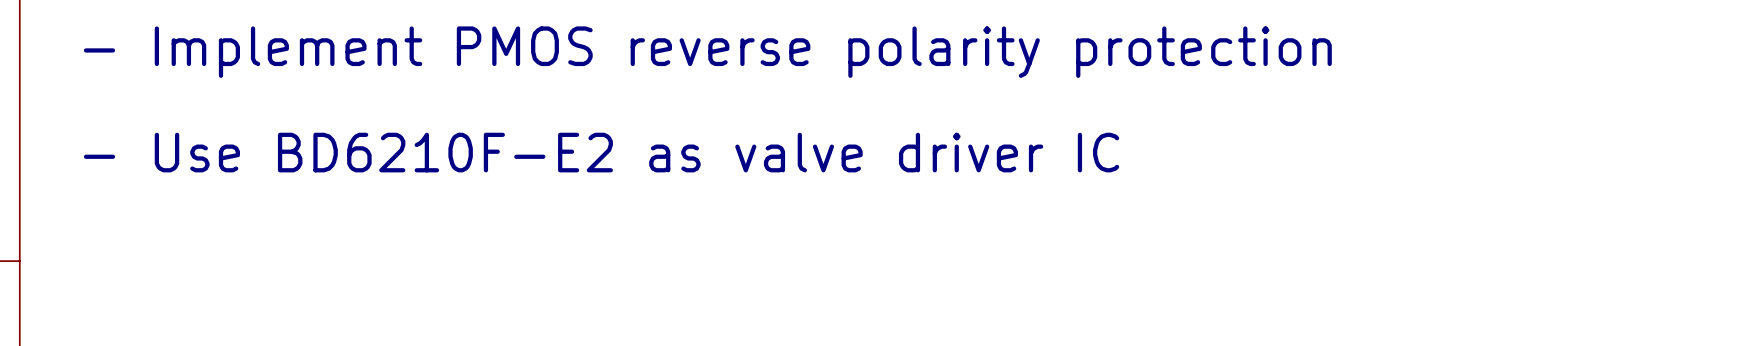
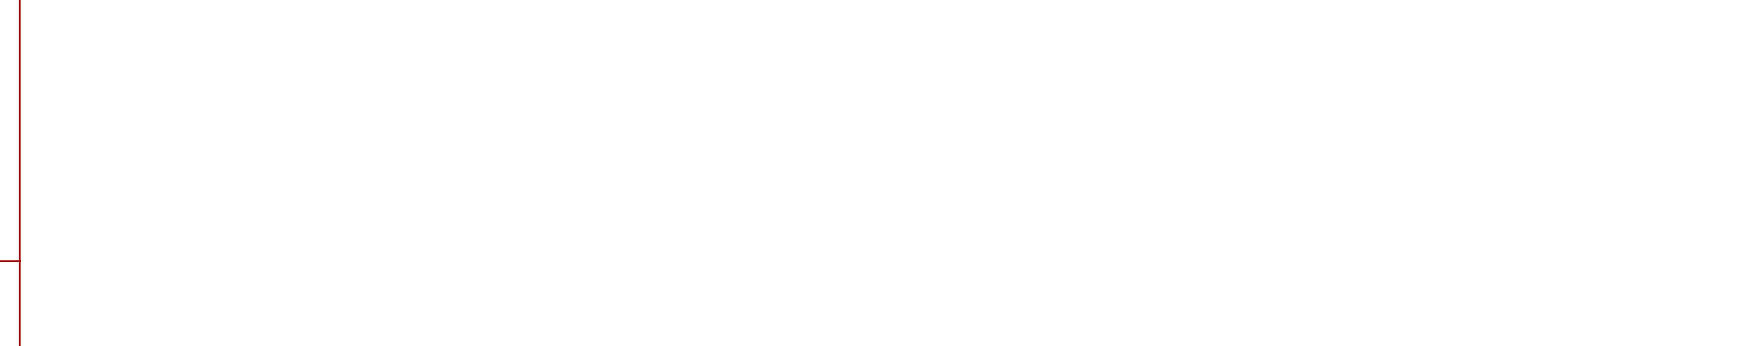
text: - Implement PMOS reverse polarity protection (707, 52) -> none
text: - Use BD6210F-E2 as valve driver IC (601, 152) -> none

